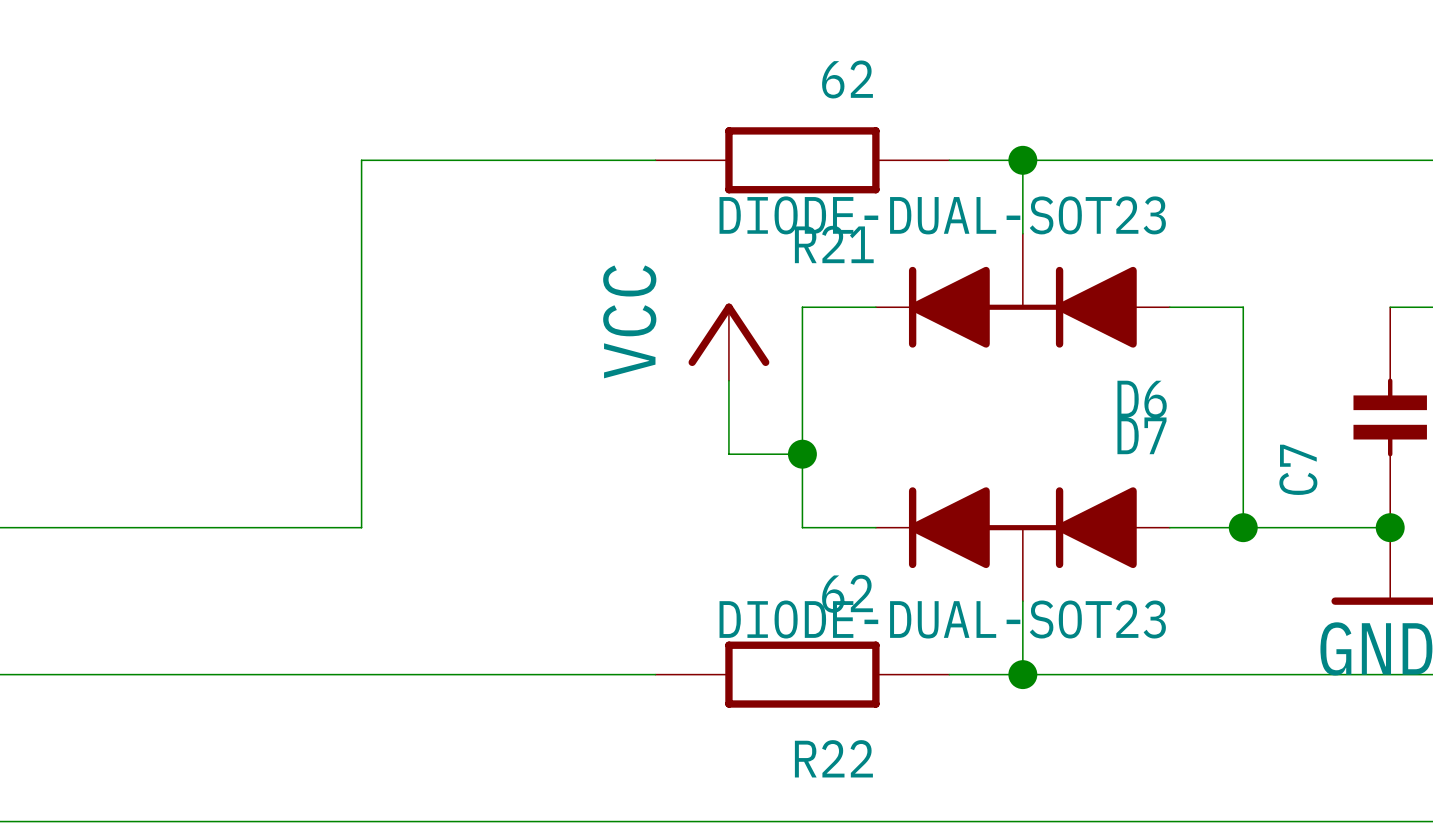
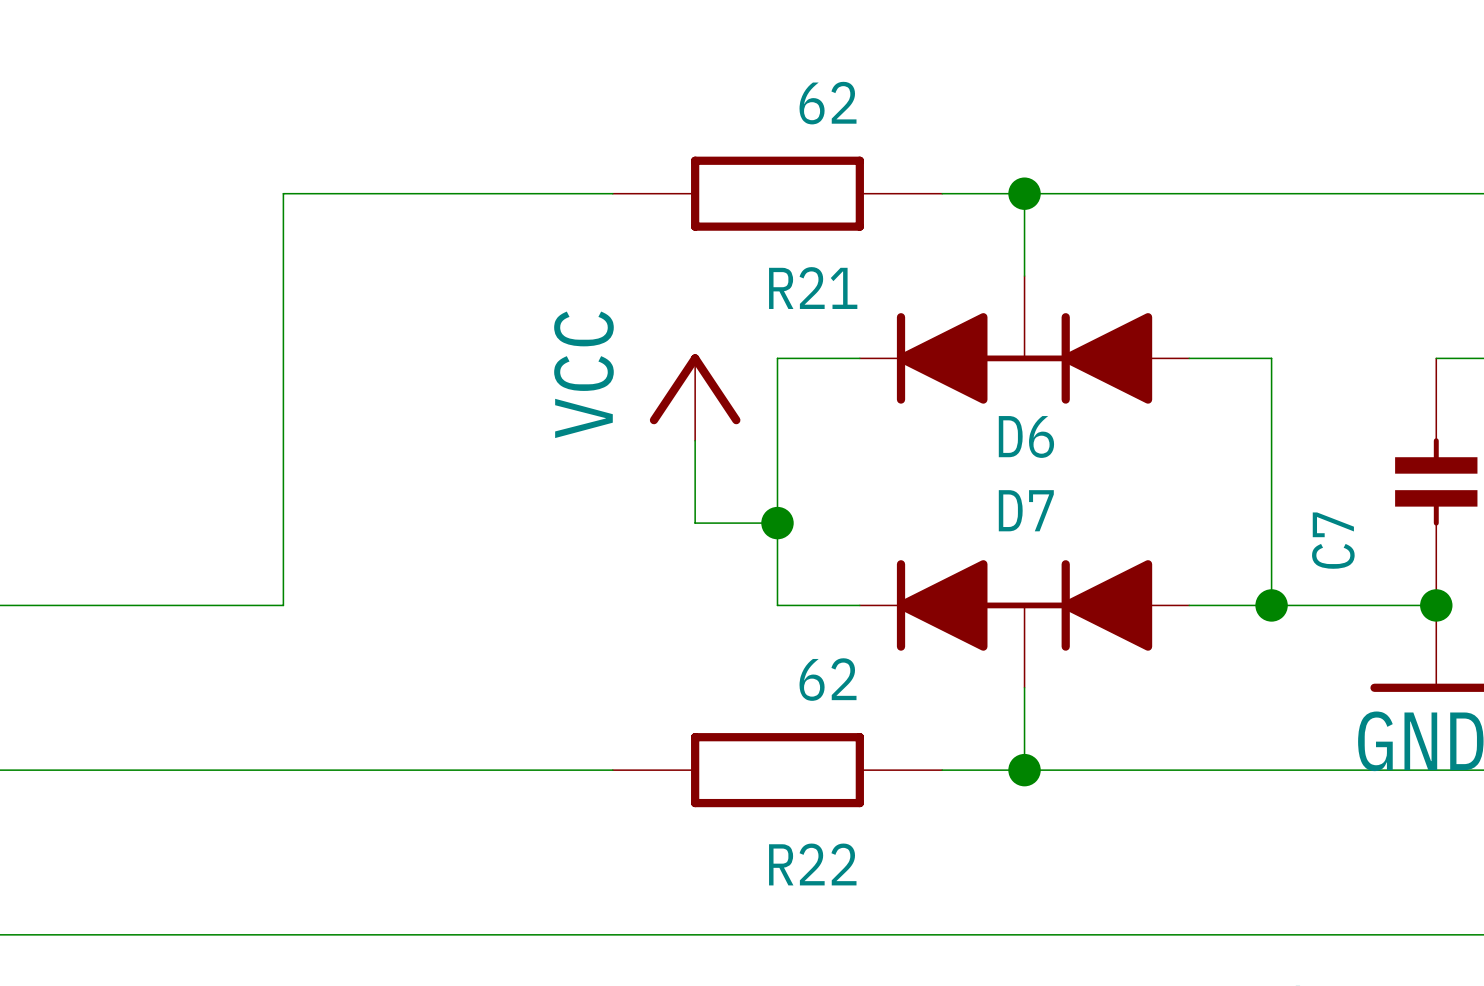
D6 value: DIODE-DUAL-SOT23 (942, 215) -> none
D6 name position: D6 (1142, 399) -> D6 (1026, 436)
D7 name position: D7 (1141, 435) -> D7 (1026, 510)
D7 value: DIODE-DUAL-SOT23 (942, 619) -> none

